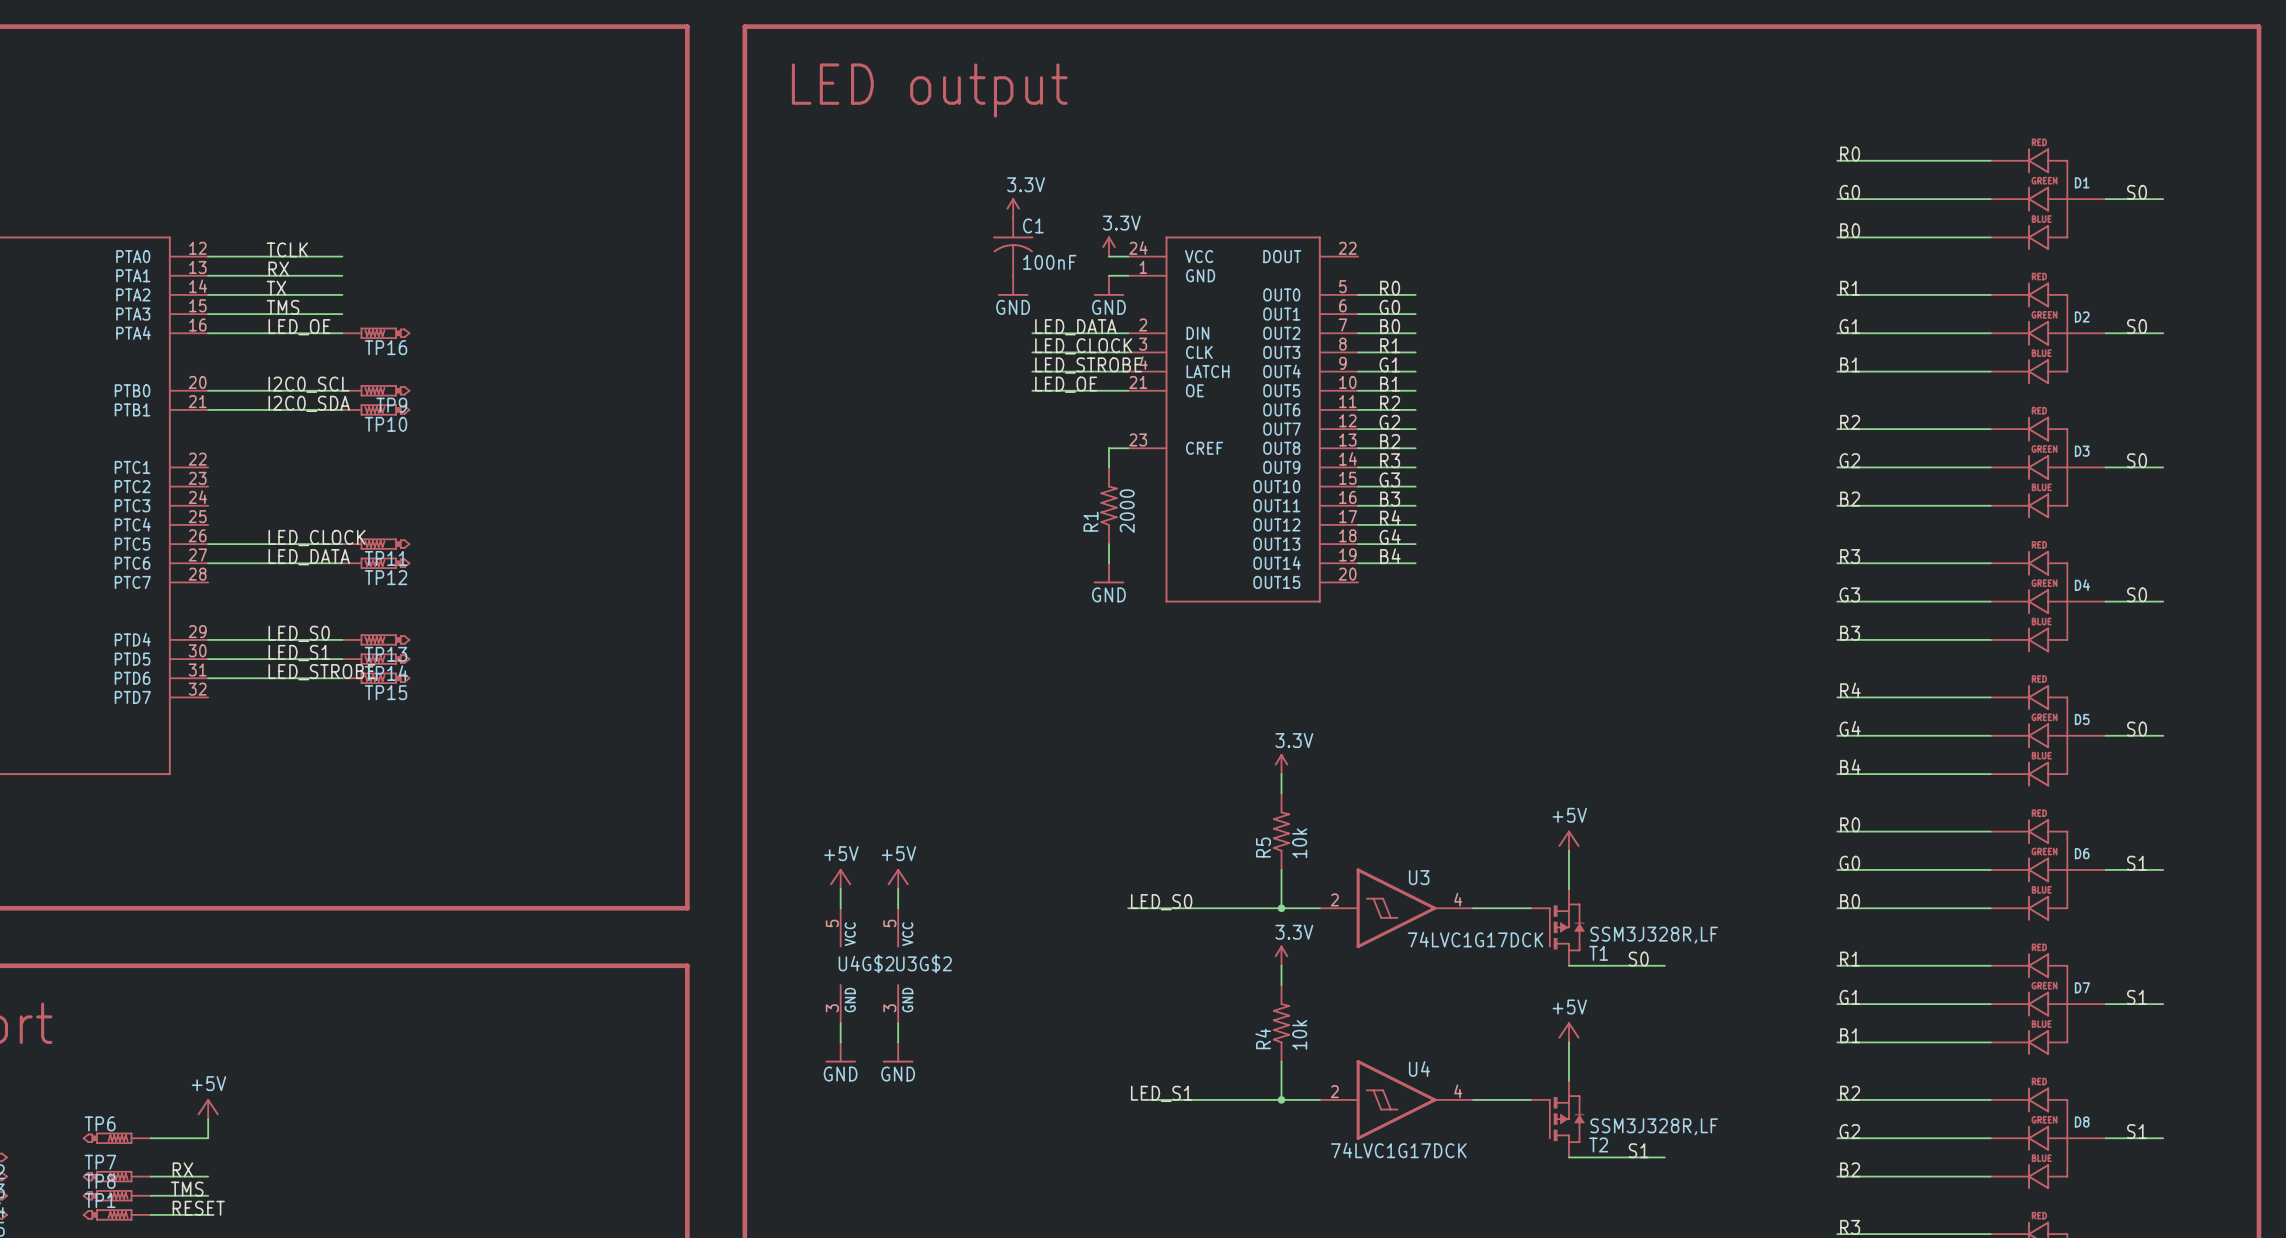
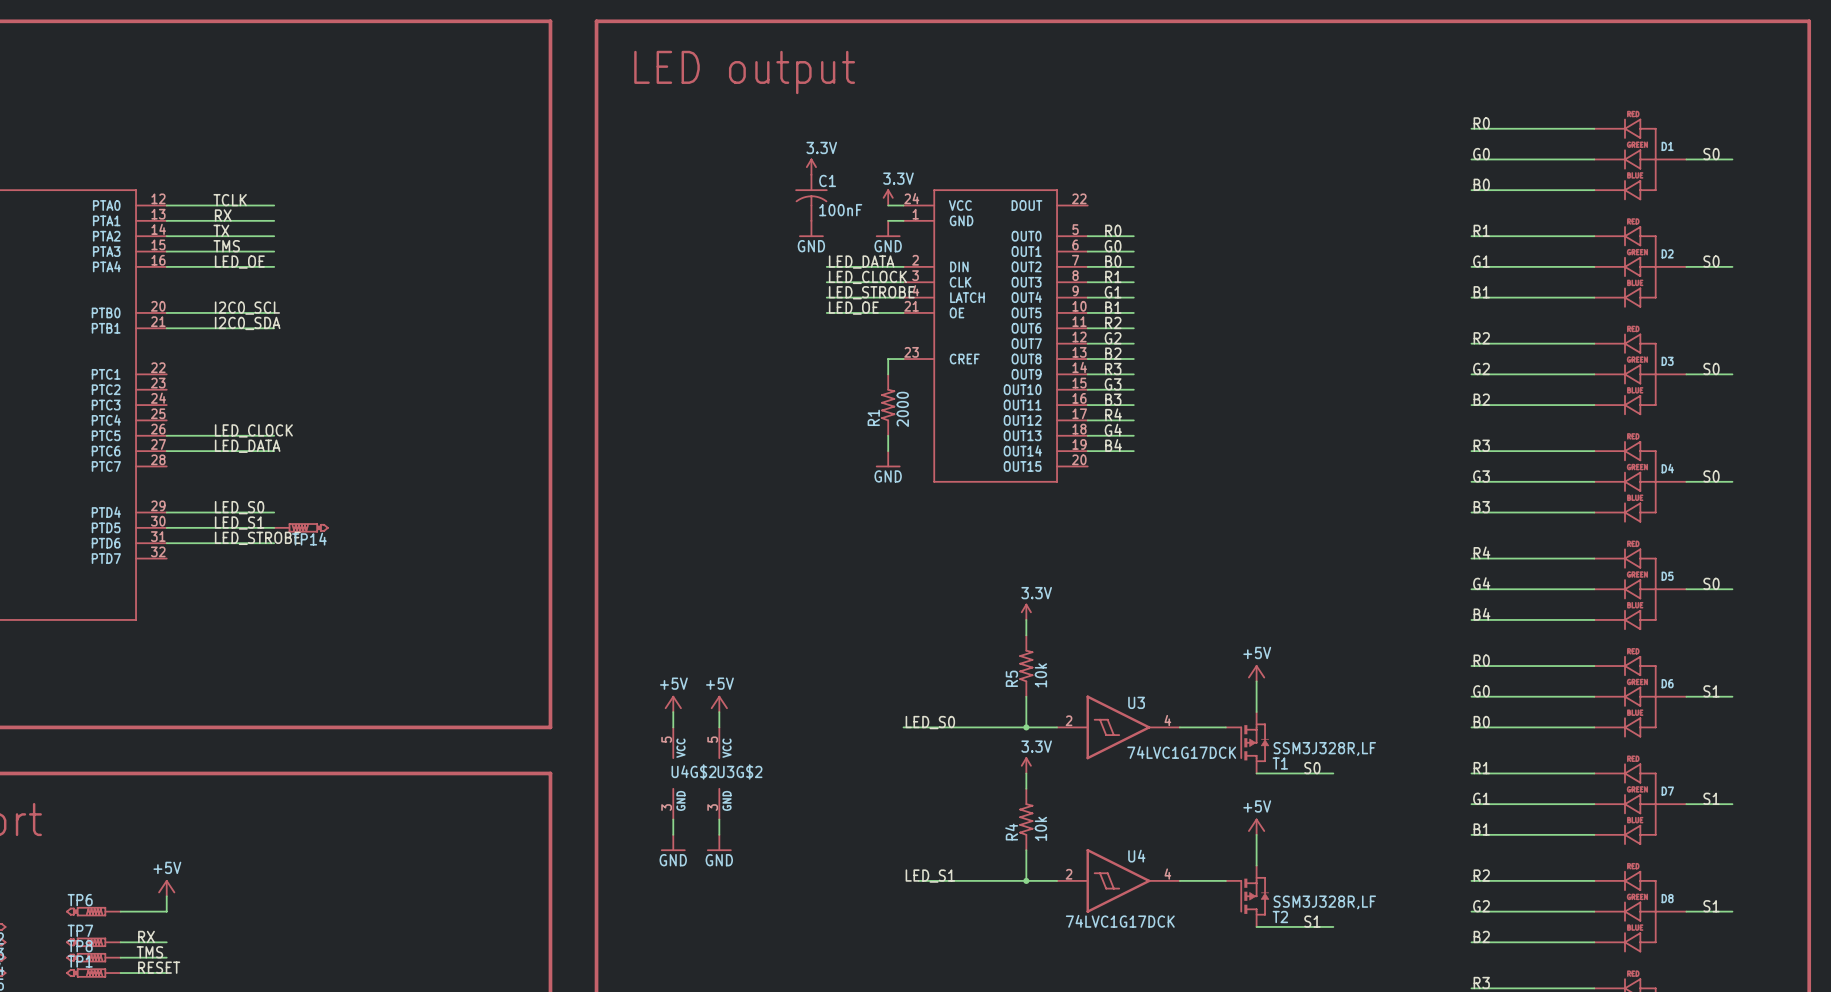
TP16: (376, 333) -> none
TP9: (376, 390) -> none
TP10: (376, 409) -> none
TP11: (376, 544) -> none
TP12: (376, 563) -> none
TP13: (376, 639) -> none
TP15: (376, 678) -> none

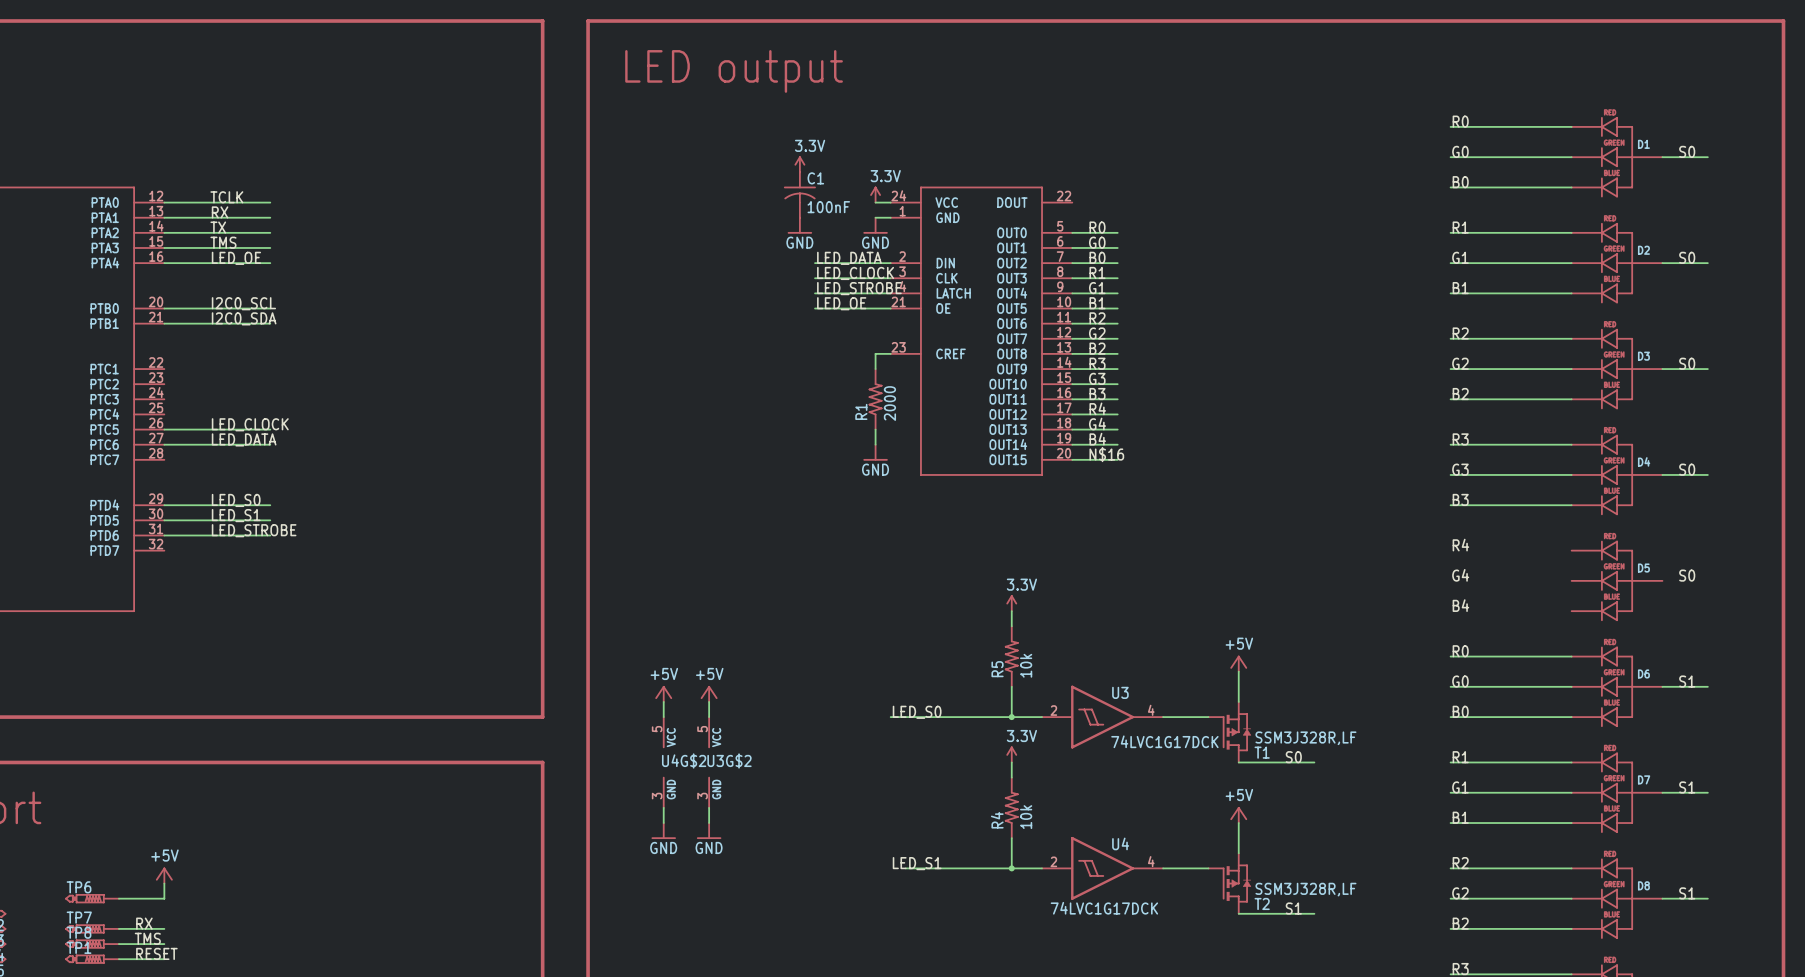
label: none -> N$16 (1106, 454)
wire: none -> (1072, 459) (1117, 459)
TP14: (301, 527) -> none
wire: (1471, 558) (1594, 558) -> none
wire: (1471, 589) (1594, 589) -> none
wire: (1686, 589) (1732, 589) -> none
wire: (1471, 619) (1594, 619) -> none

